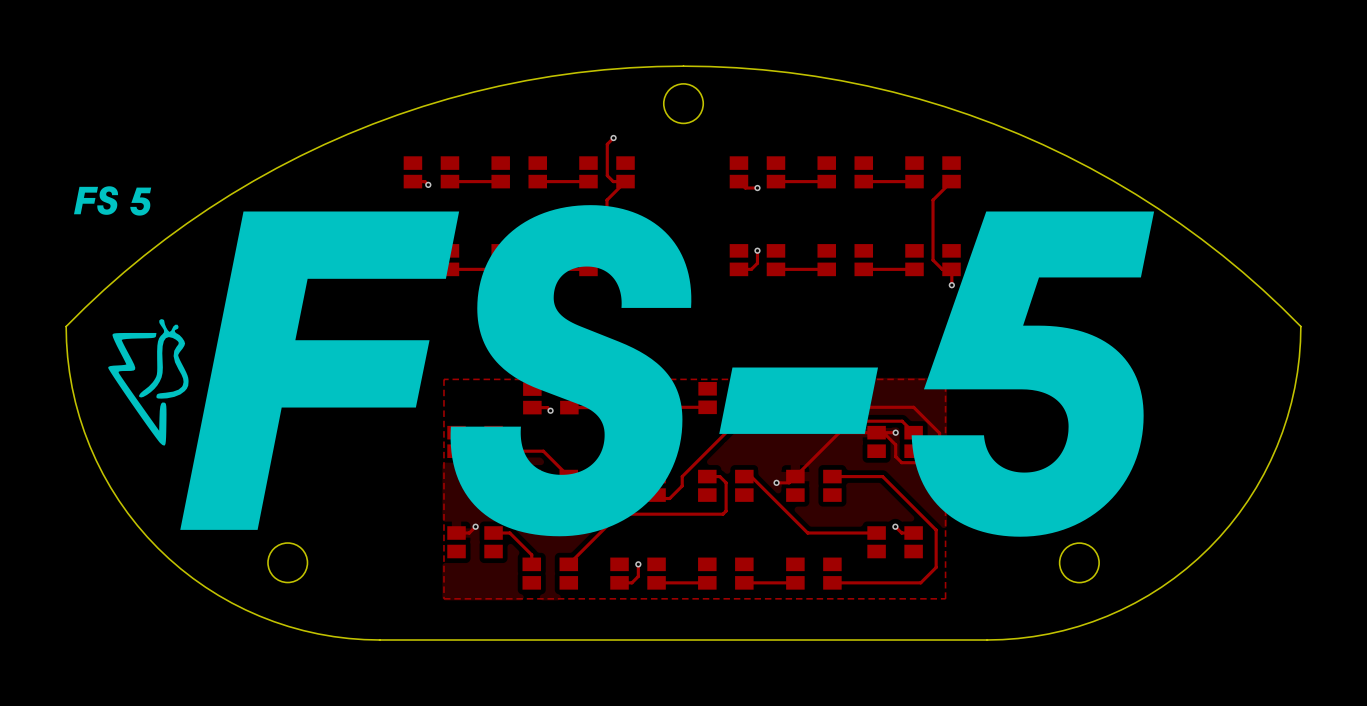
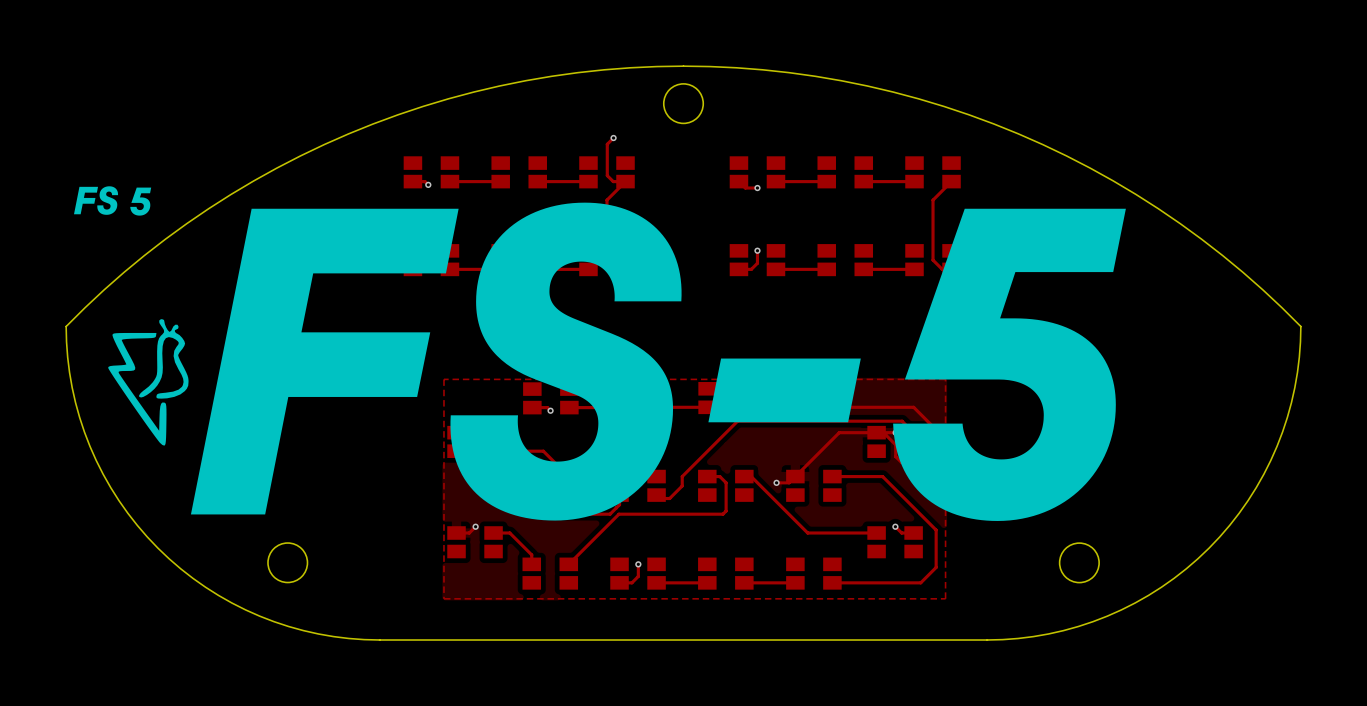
drawing shape: [450, 205, 692, 537] -> [450, 202, 682, 521]
drawing: none -> [893, 208, 1126, 521]
drawing shape: [180, 211, 460, 530] -> [190, 208, 459, 515]
drawing: [911, 211, 1155, 537] -> none
drawing: none -> [708, 358, 861, 423]
drawing: [719, 367, 879, 434] -> none

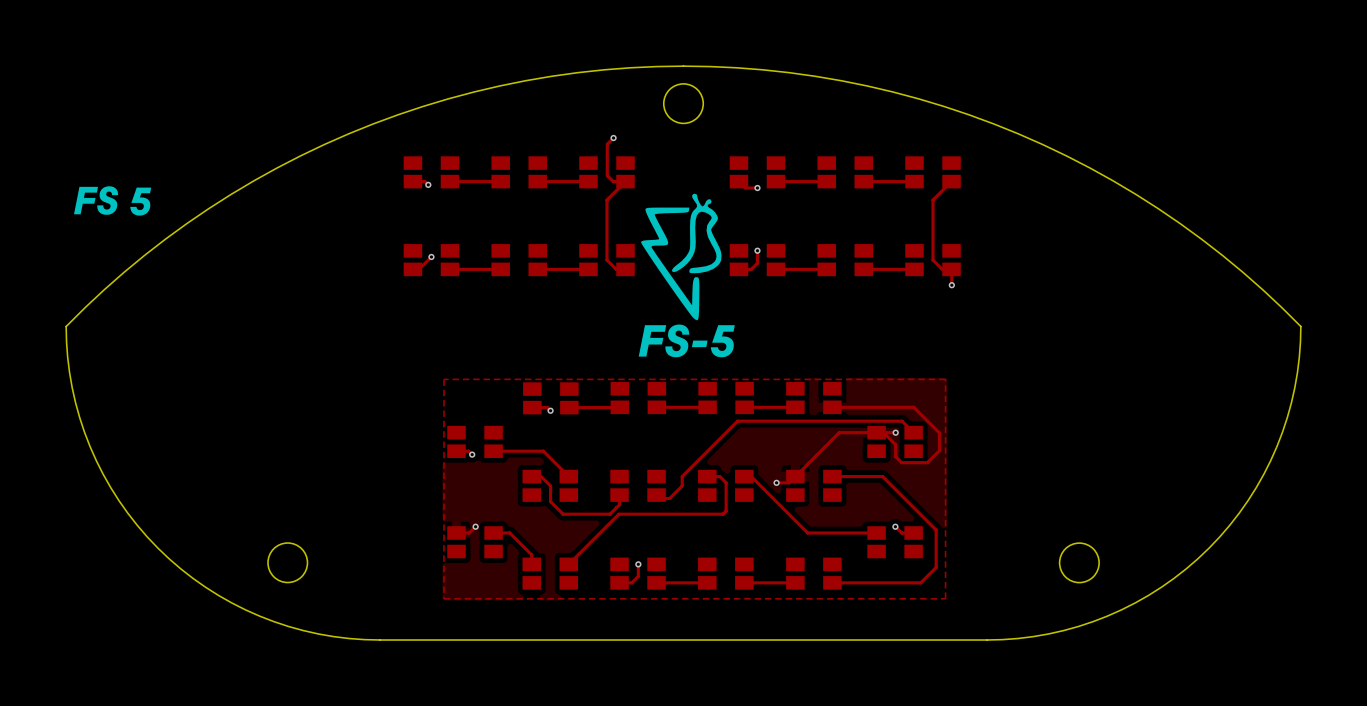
drawing: none -> [638, 193, 735, 358]
drawing: [108, 202, 682, 521] -> none
drawing: [893, 208, 1126, 521] -> none
drawing: [708, 358, 861, 423] -> none

